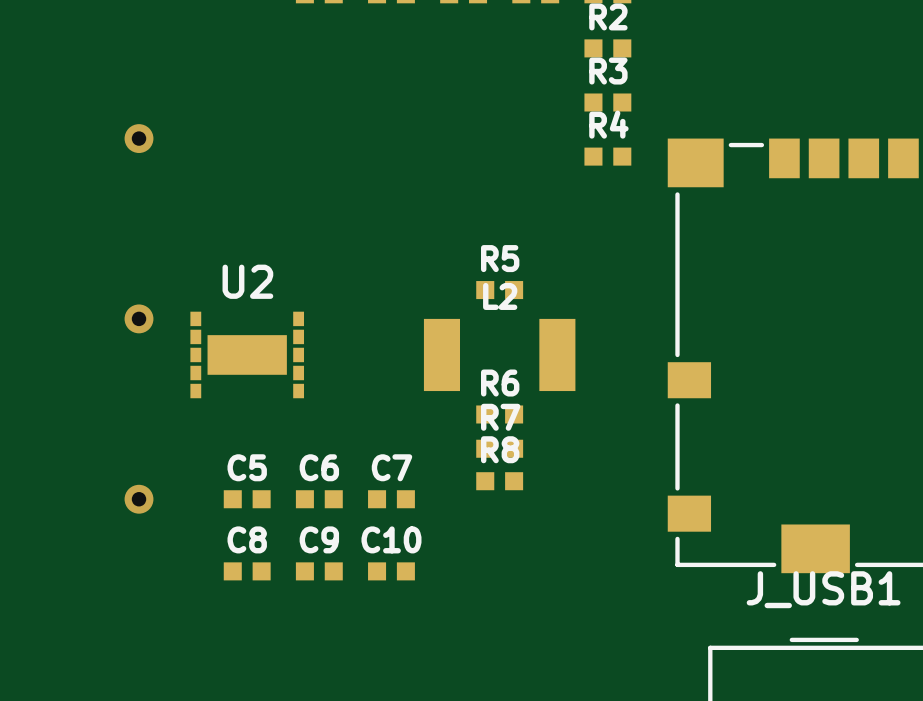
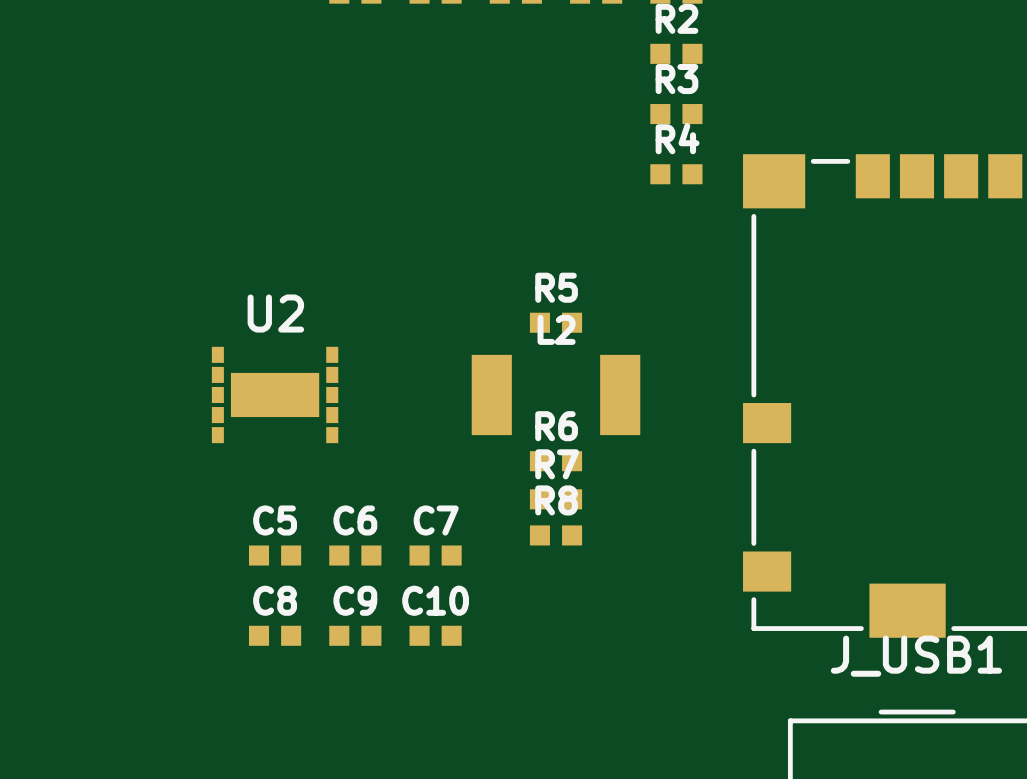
via: (139, 138) -> none
via: (139, 318) -> none
via: (139, 499) -> none

